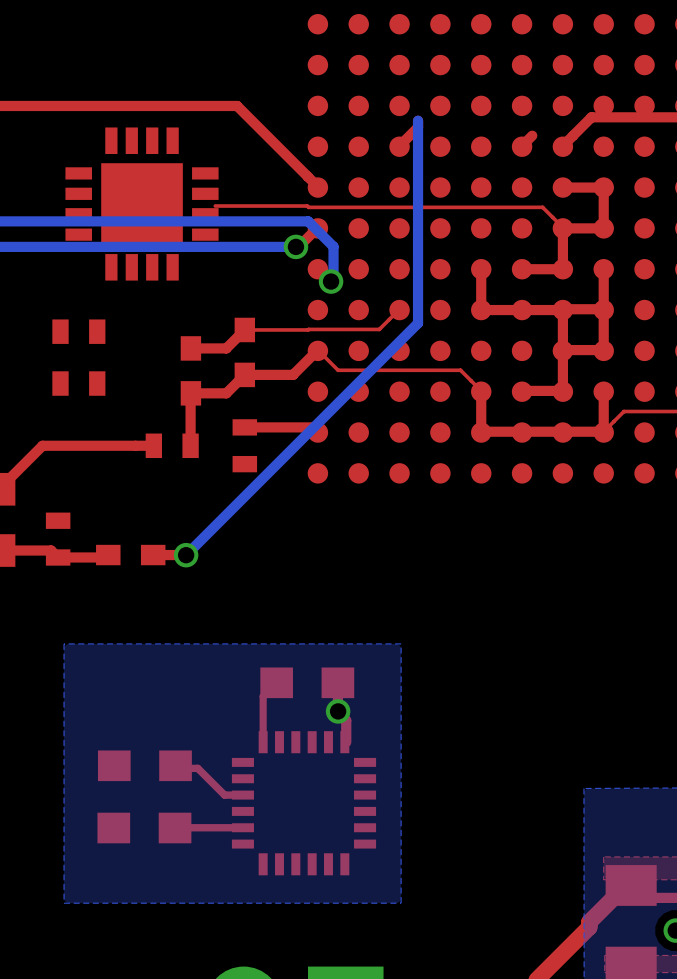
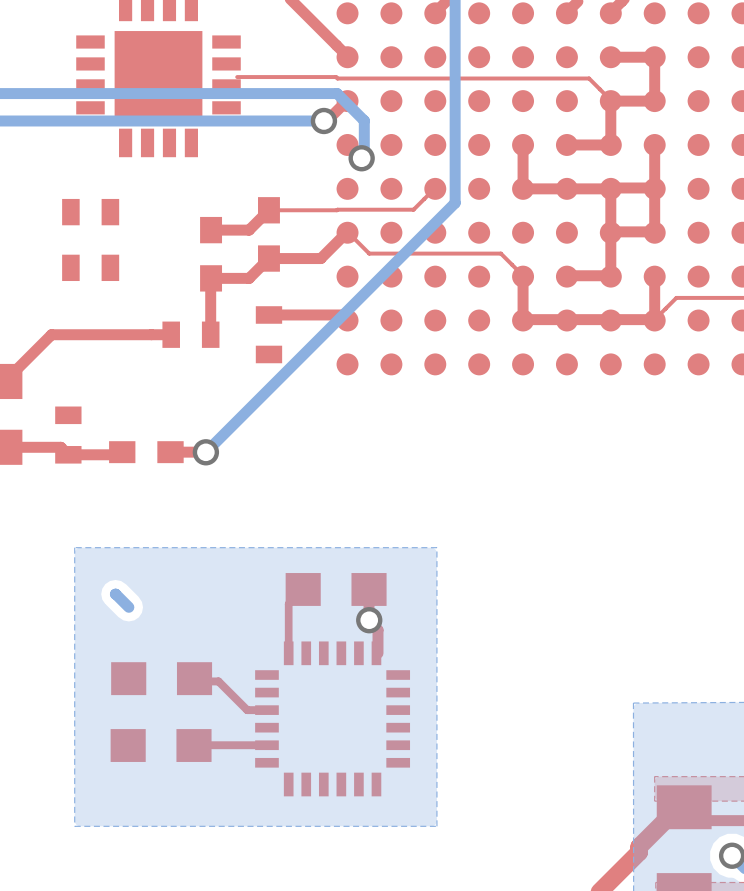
bottom track: none -> (115, 594) (128, 607)

